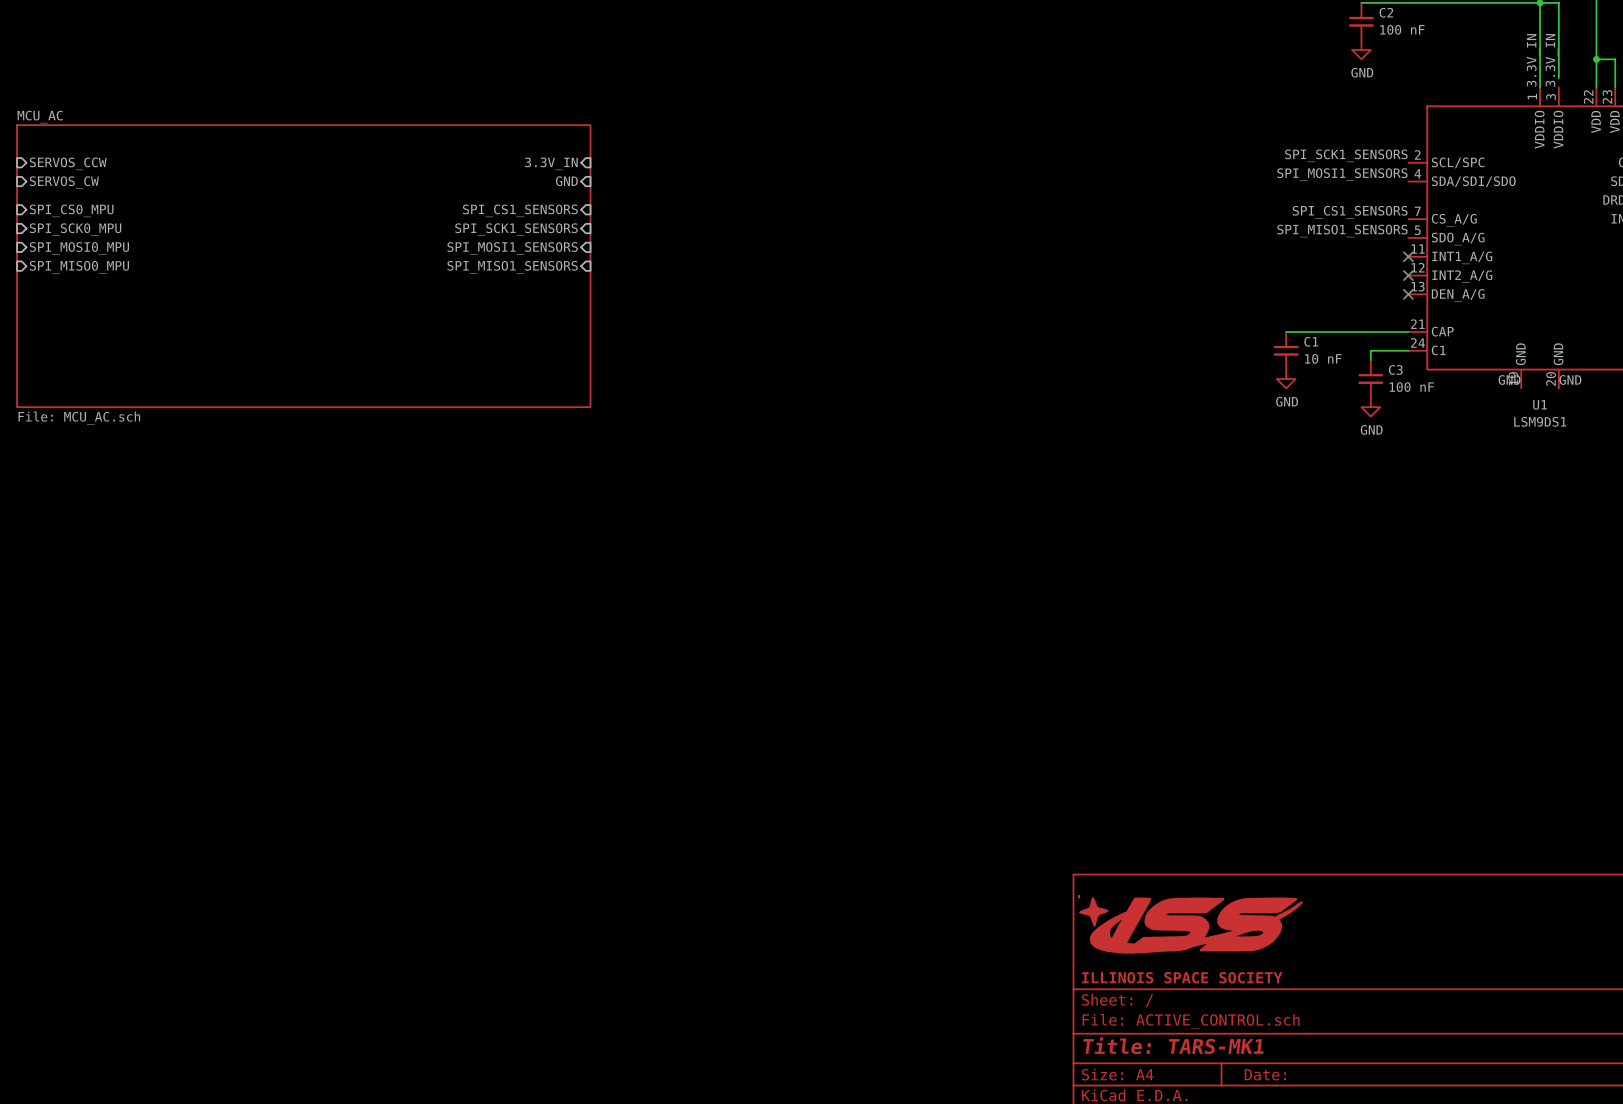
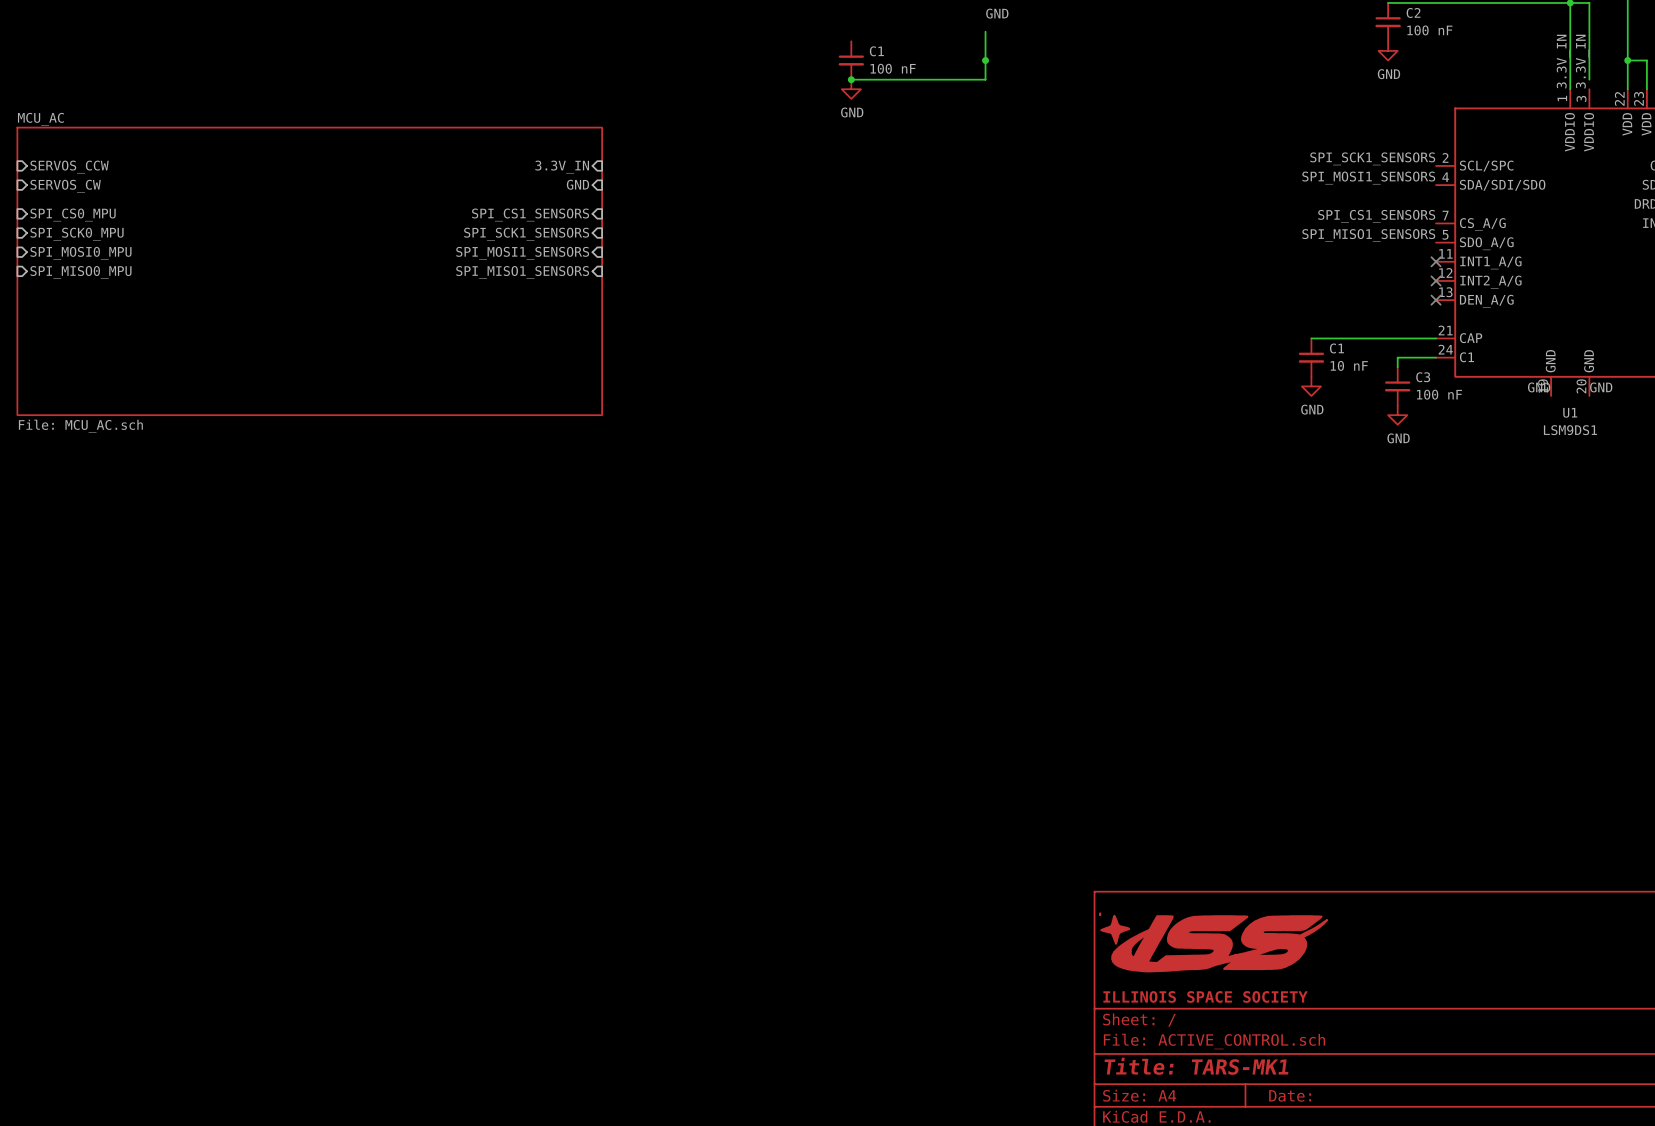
label: none -> GND (997, 13)
wire: none -> (985, 31) (985, 79) (851, 79)
C1: none -> 100 nF (851, 60)
junction: none -> (985, 60)
junction: none -> (851, 79)
power symbol: none -> GND (851, 89)

